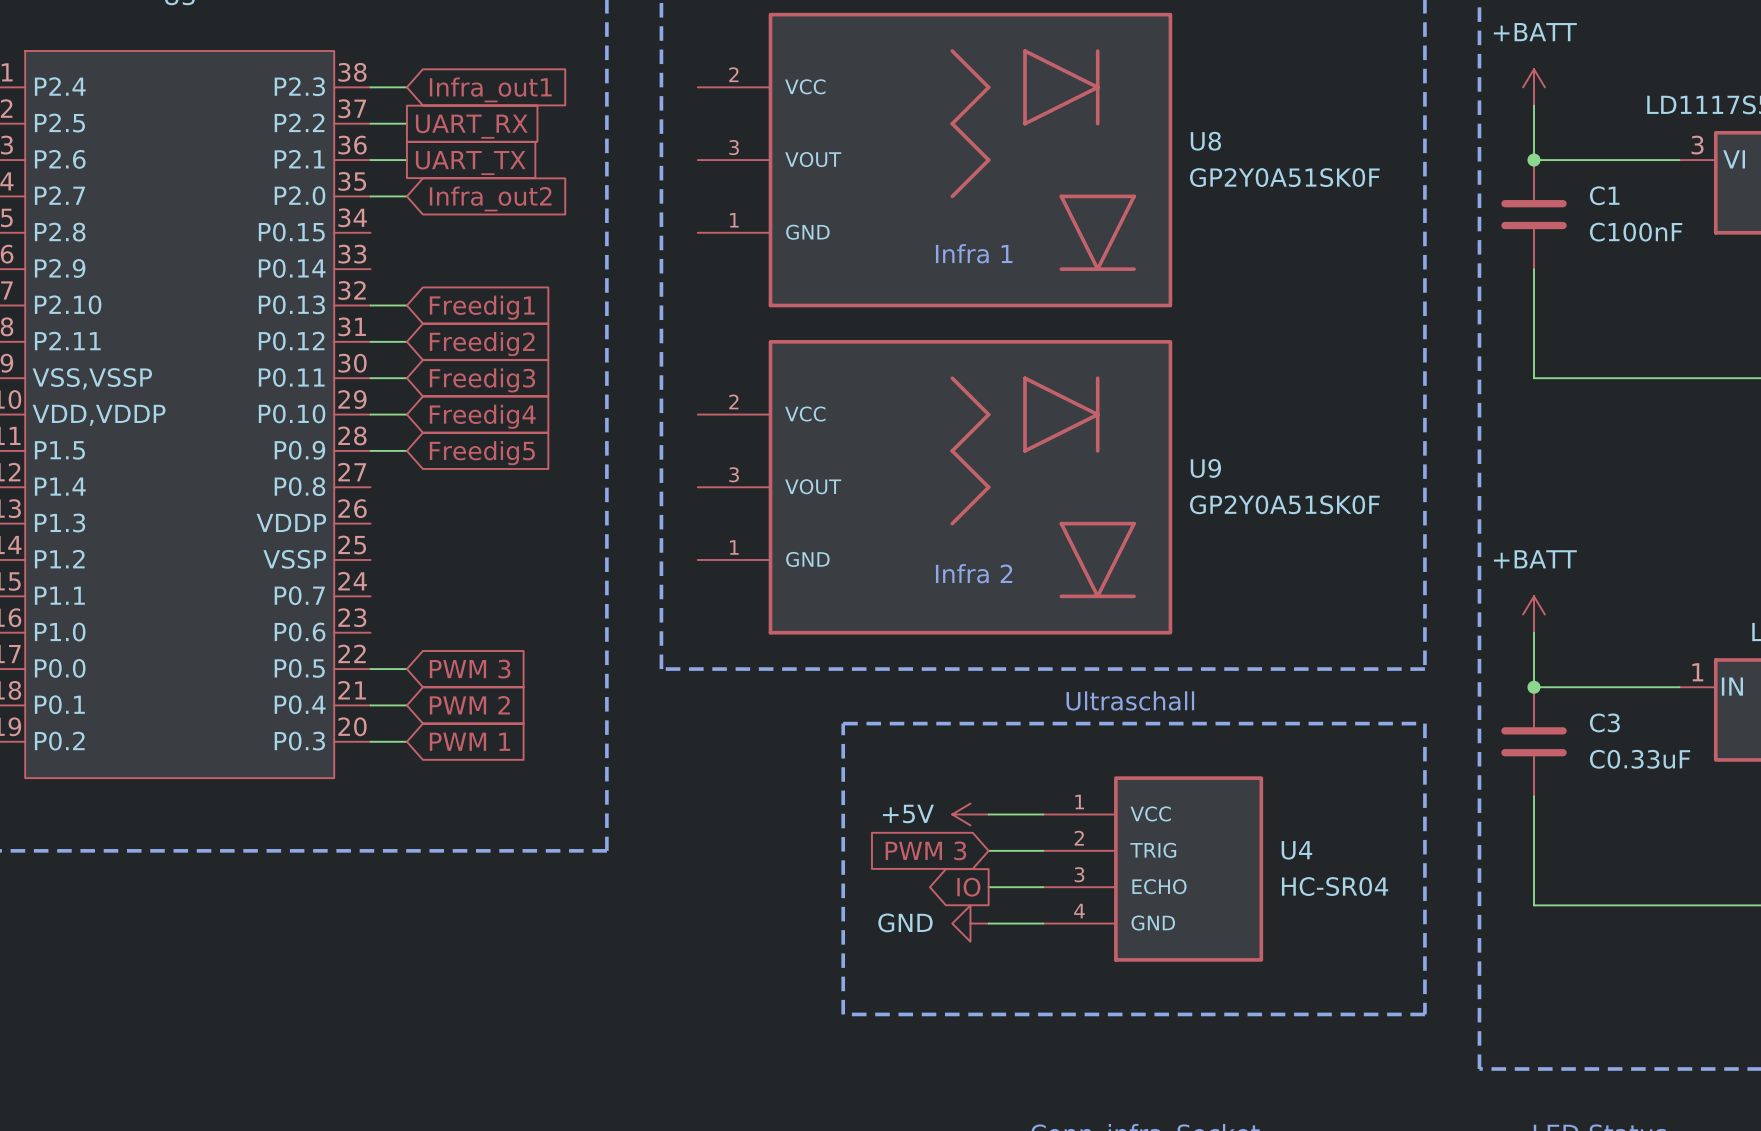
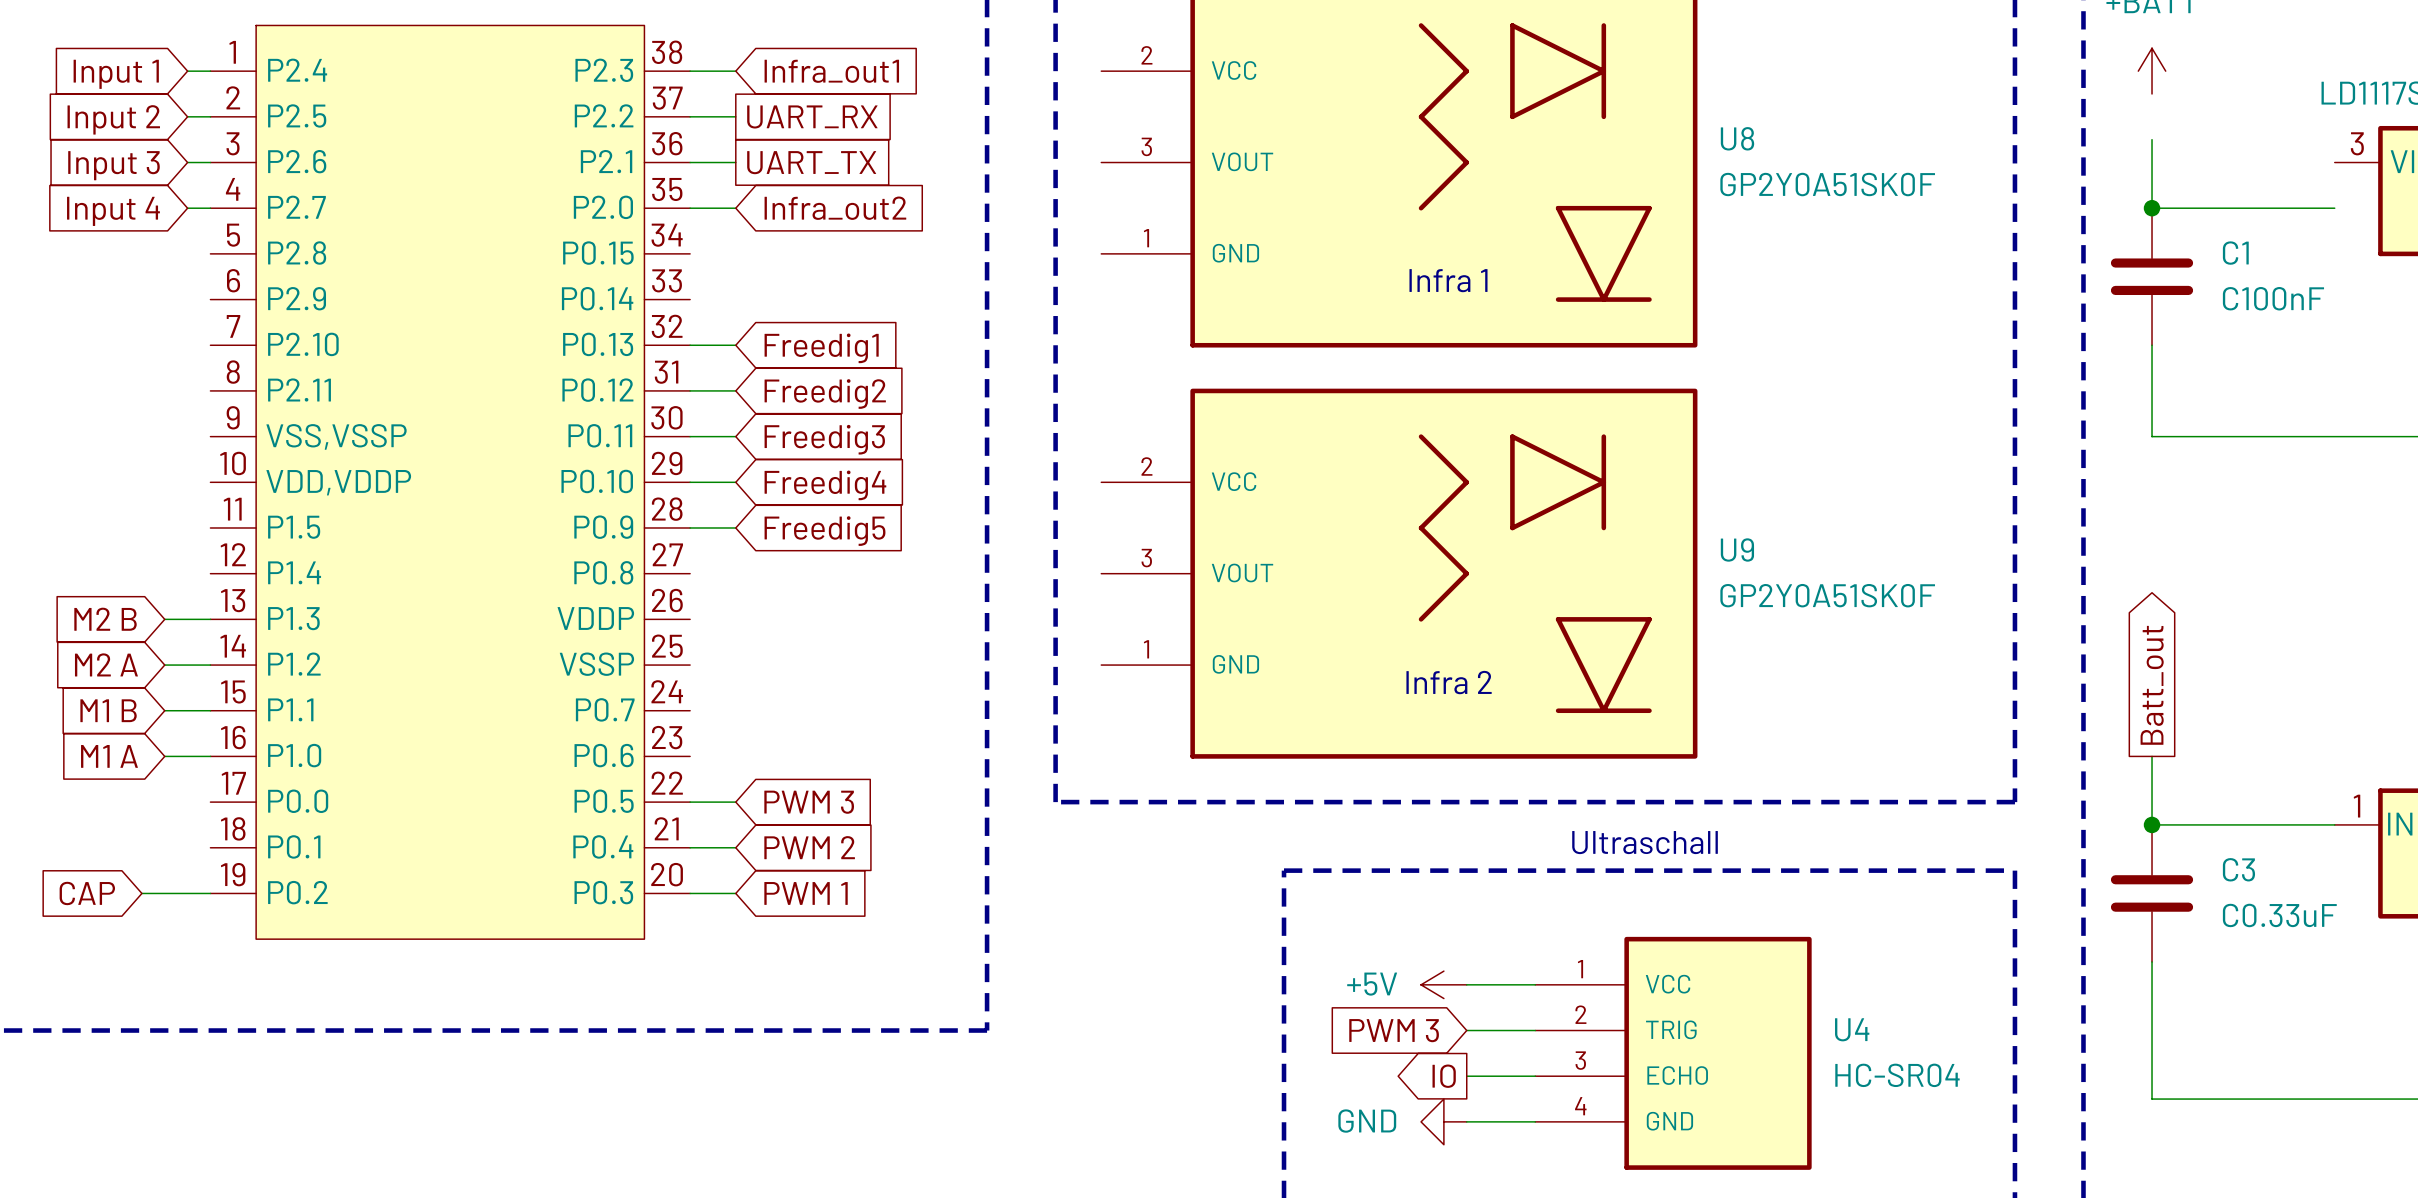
wire: (1534, 105) (1534, 141) -> none
wire: (1534, 160) (1679, 160) -> (2152, 162) (2152, 208) (2334, 208)
junction position: (1534, 160) -> (2152, 208)
C1 position: (1534, 214) -> (2152, 276)
global label: none -> Batt_out (2152, 685)
power symbol: +BATT (1534, 614) -> none

